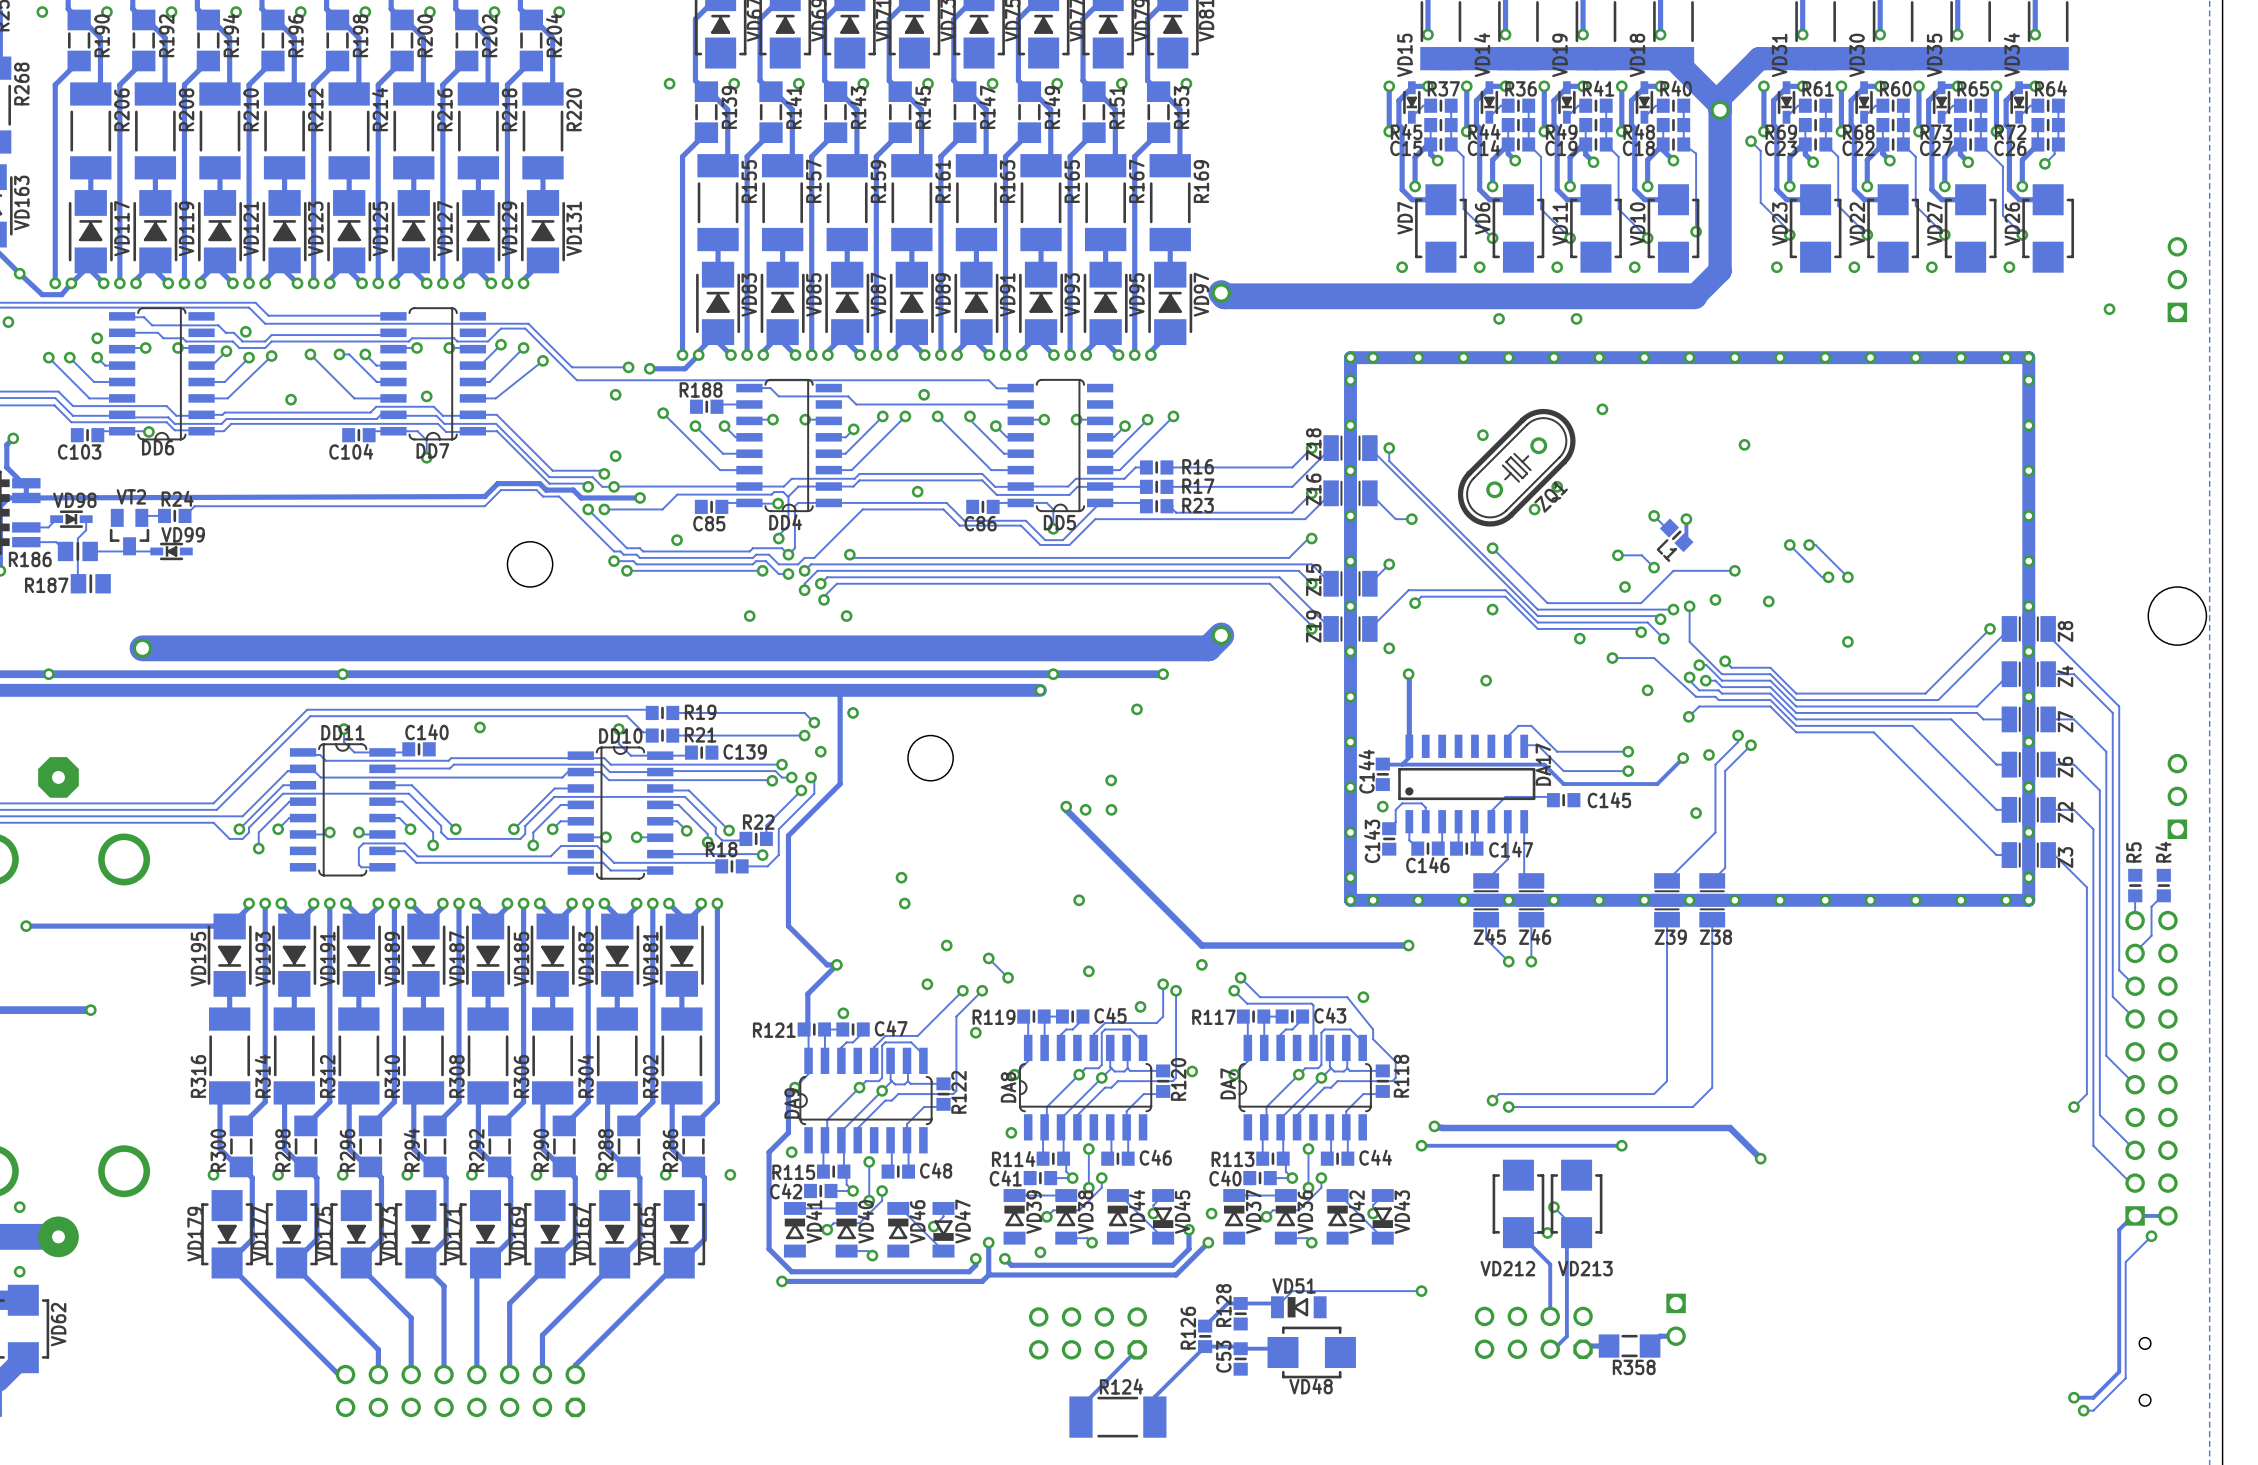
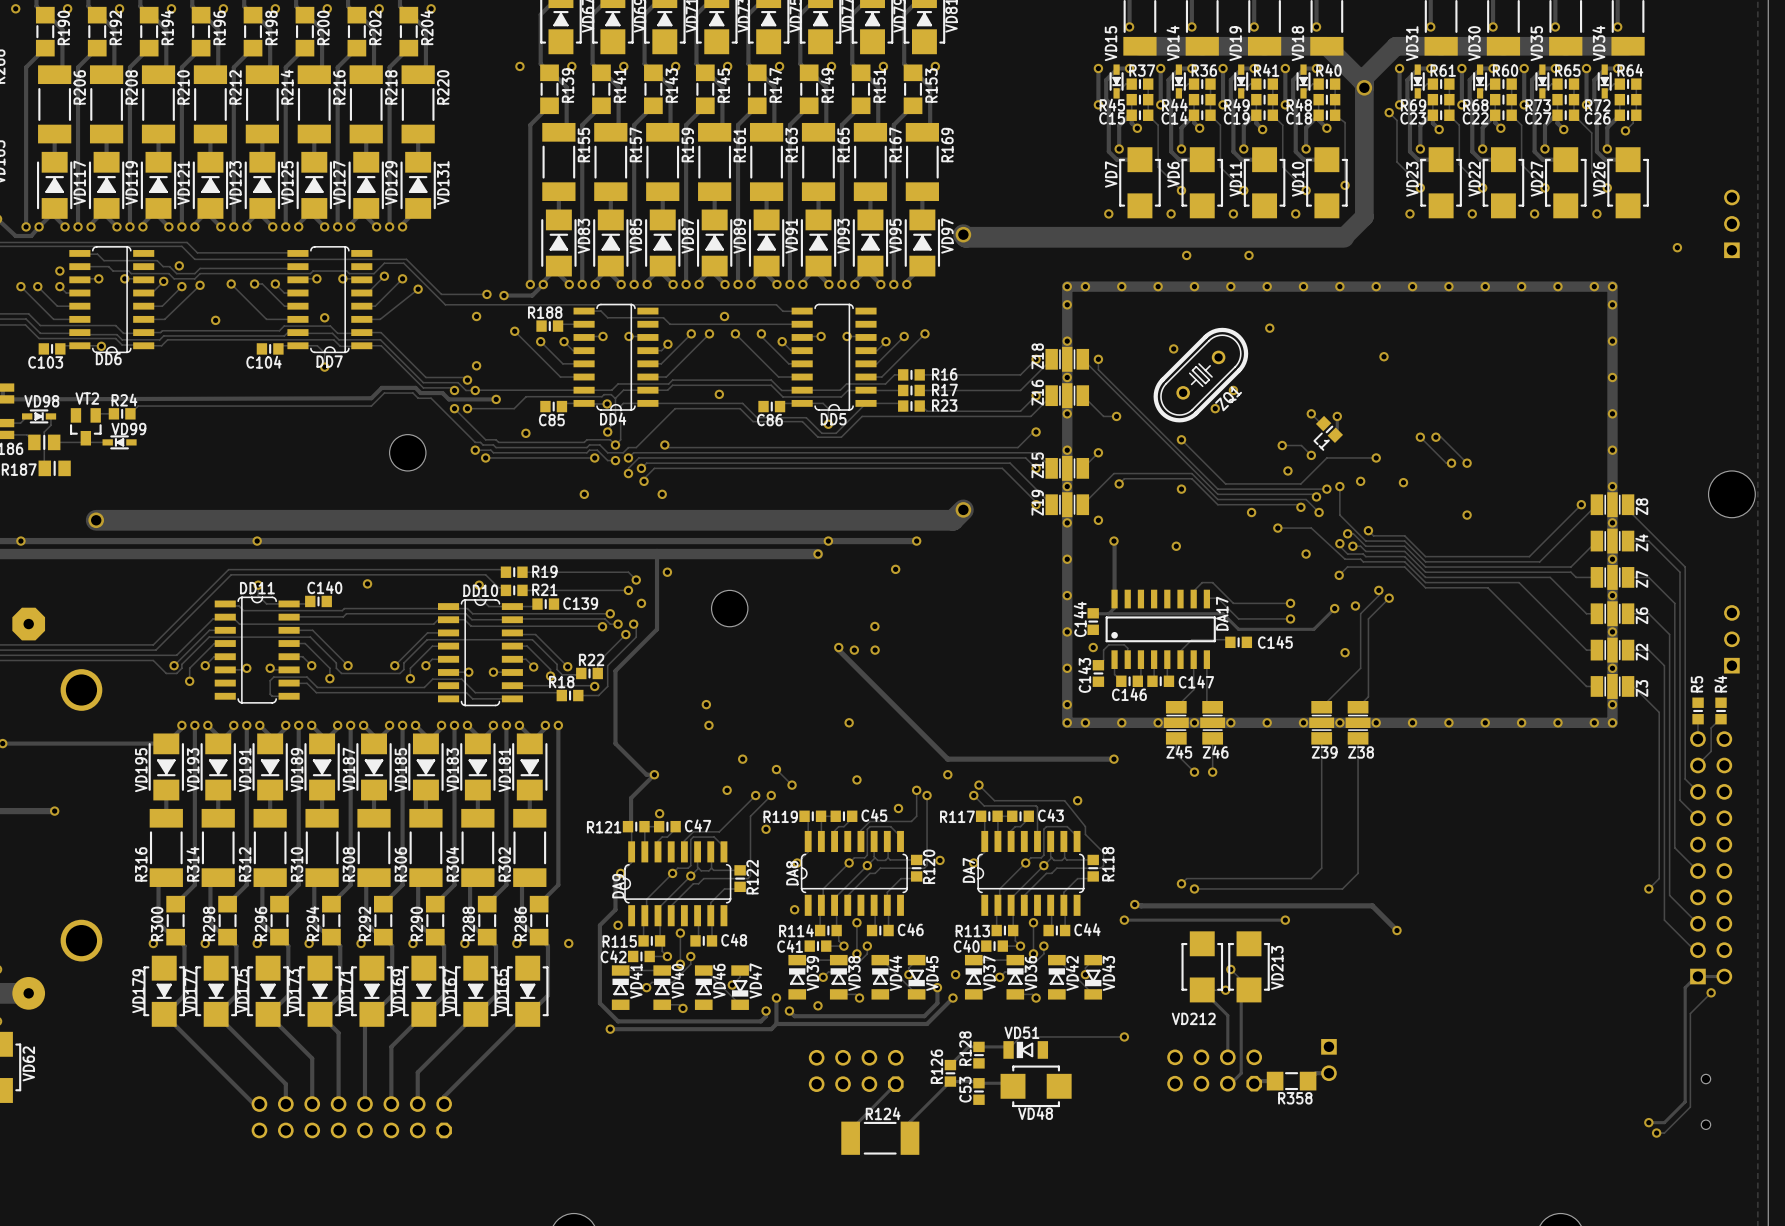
VD213 name rotation: 0° (1585, 1268) -> 90° counterclockwise (1277, 967)
VD213 name position: VD213 (1585, 1268) -> VD213 (1277, 967)

